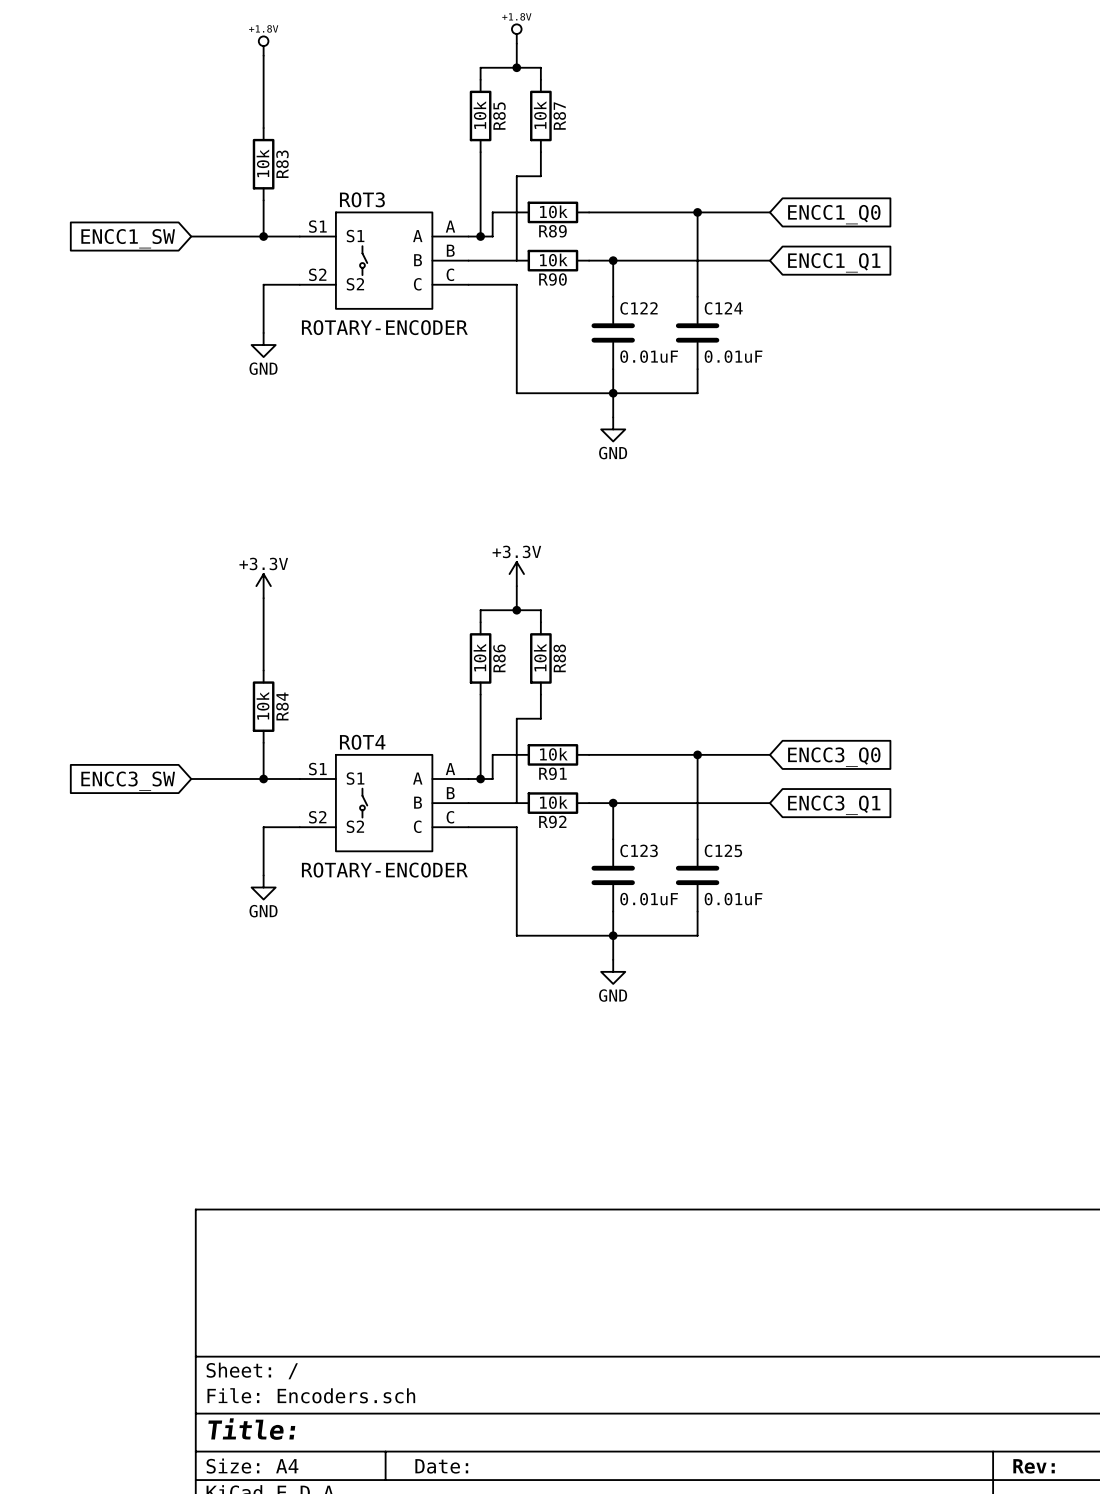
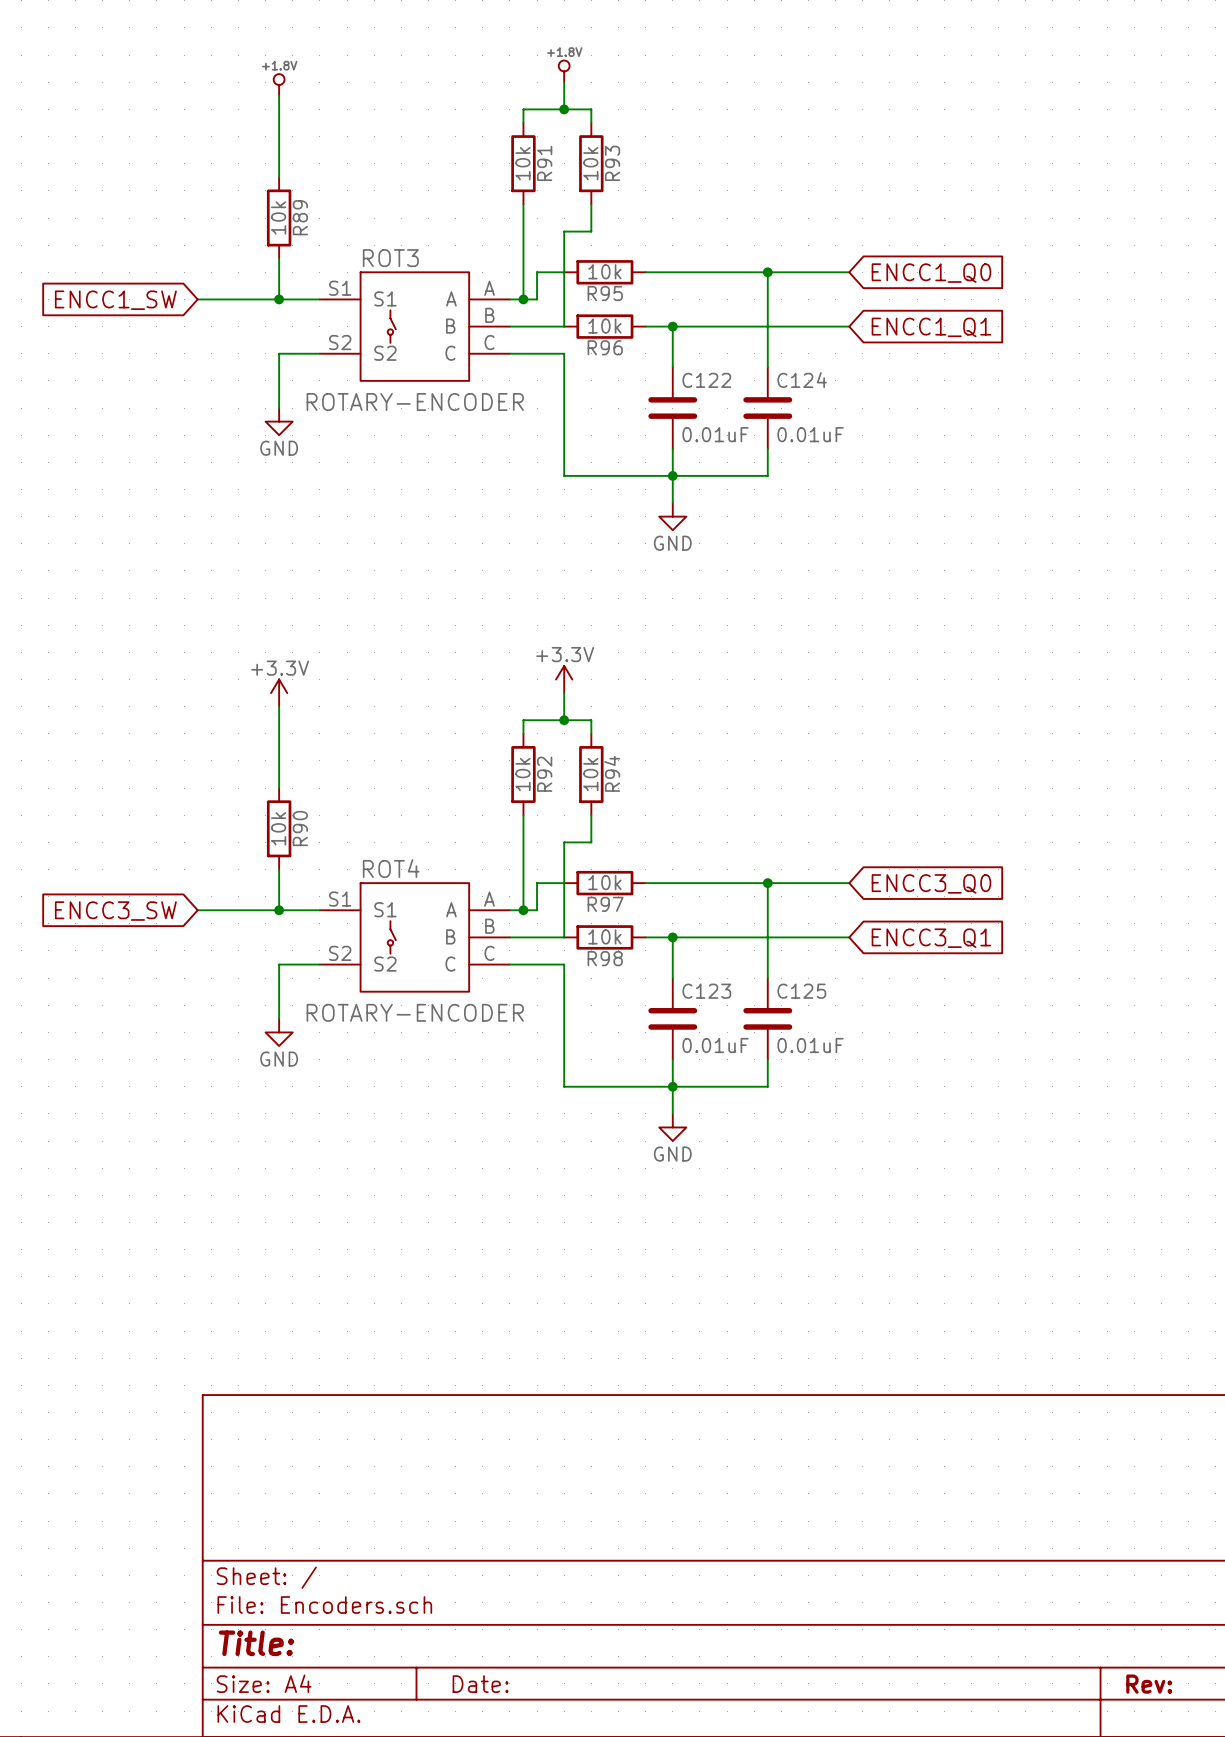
R85 name: R85 (499, 116) -> R91 (544, 163)
R87 name: R87 (559, 116) -> R93 (612, 163)
R83 name: R83 (282, 164) -> R89 (300, 217)
R89 name: R89 (552, 231) -> R95 (605, 293)
R90 name: R90 (552, 279) -> R96 (605, 347)
R86 name: R86 (499, 658) -> R92 (544, 774)
R88 name: R88 (559, 658) -> R94 (612, 773)
R84 name: R84 (282, 706) -> R90 (300, 828)
R91 name: R91 (552, 773) -> R97 (605, 904)
R92 name: R92 (552, 821) -> R98 (605, 958)

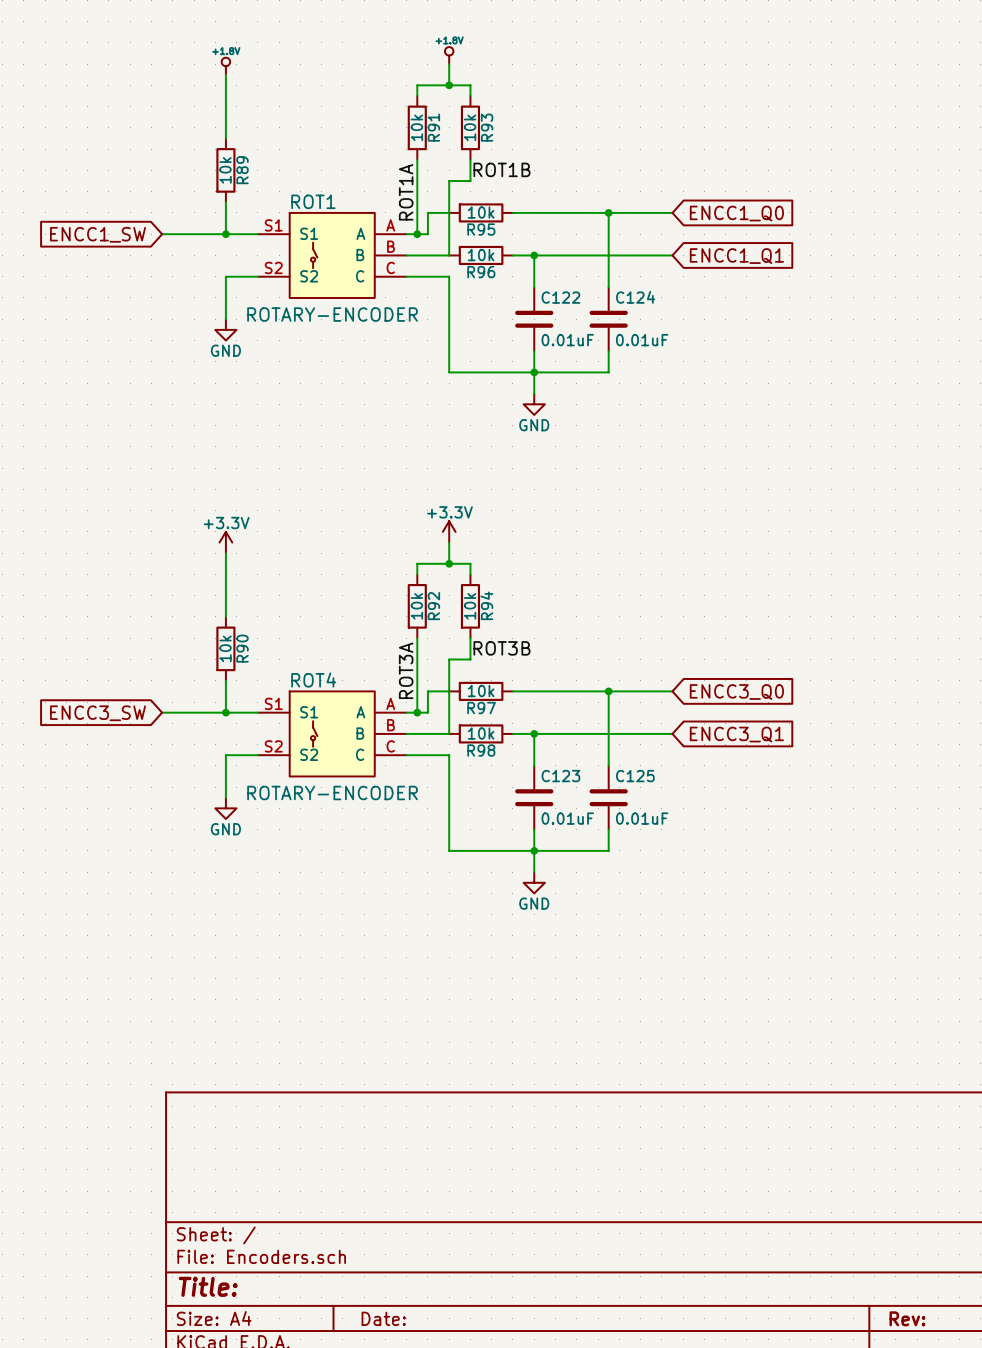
label: none -> ROT1B (501, 169)
label: none -> ROT1A (406, 192)
ROT3 name: ROT3 (390, 258) -> ROT1 (313, 201)
label: none -> ROT3B (501, 648)
label: none -> ROT3A (406, 670)

